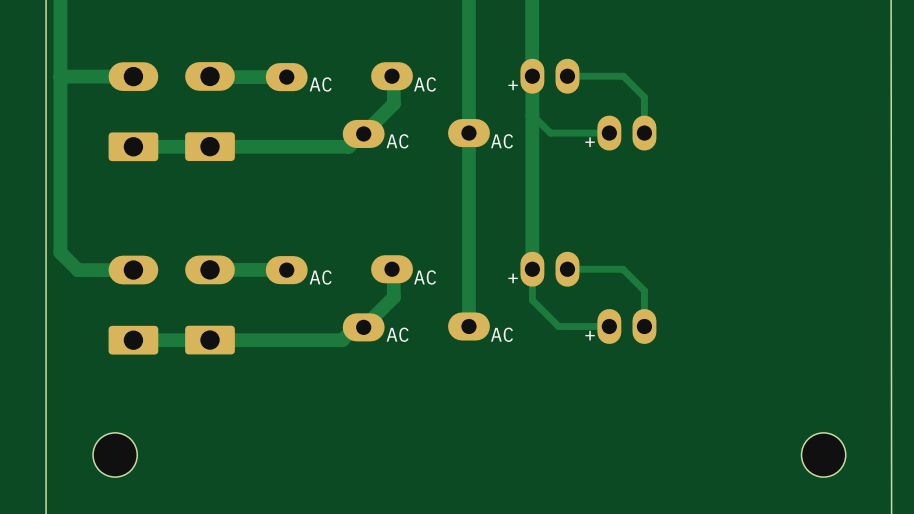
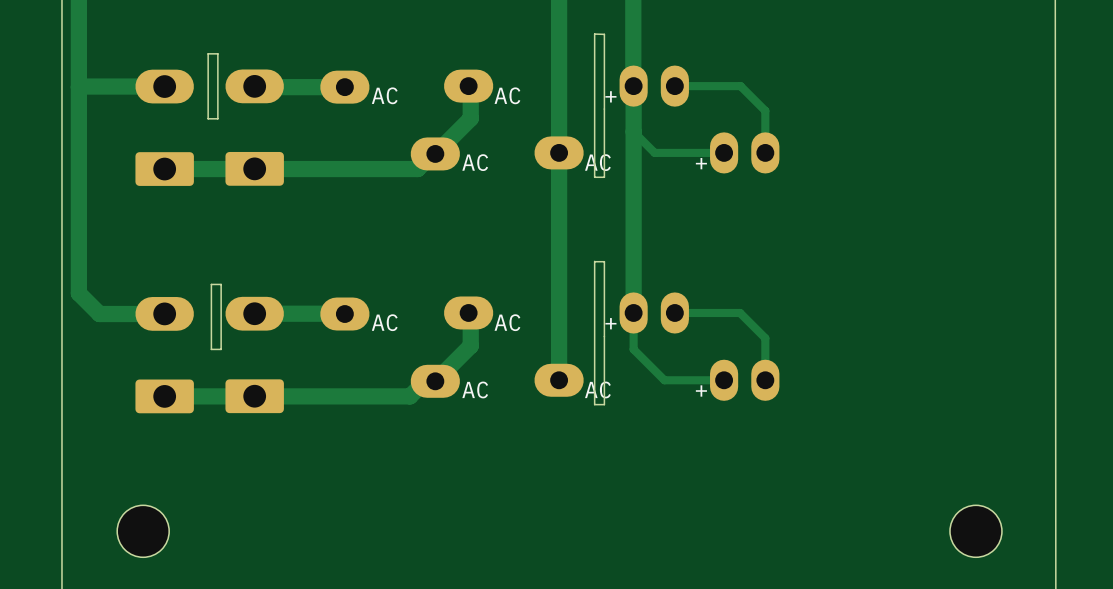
board edge: none -> (594, 34) (594, 177) (604, 177) (604, 34) (594, 34)
board edge: none -> (217, 53) (208, 53) (208, 118) (217, 118) (217, 53)
board edge: none -> (594, 261) (594, 404) (604, 404) (604, 261) (594, 261)
board edge: none -> (221, 284) (211, 284) (211, 349) (221, 349) (221, 284)

